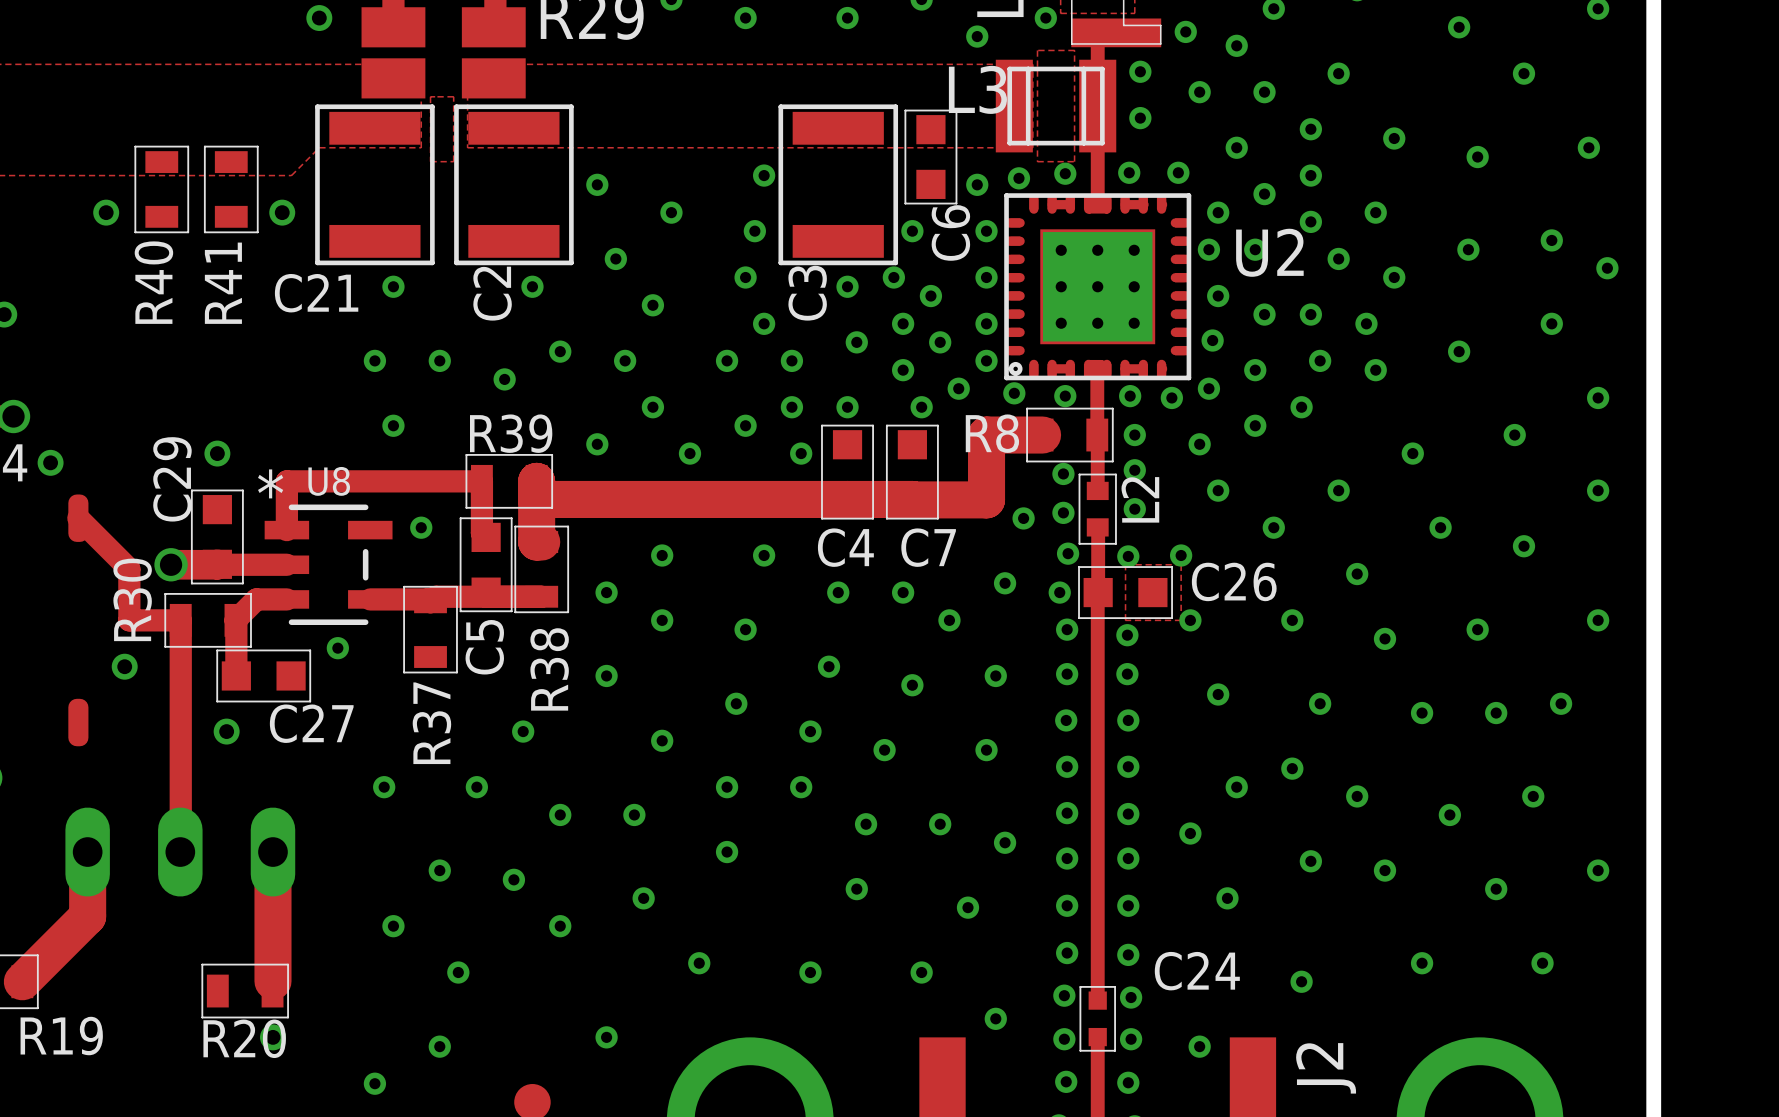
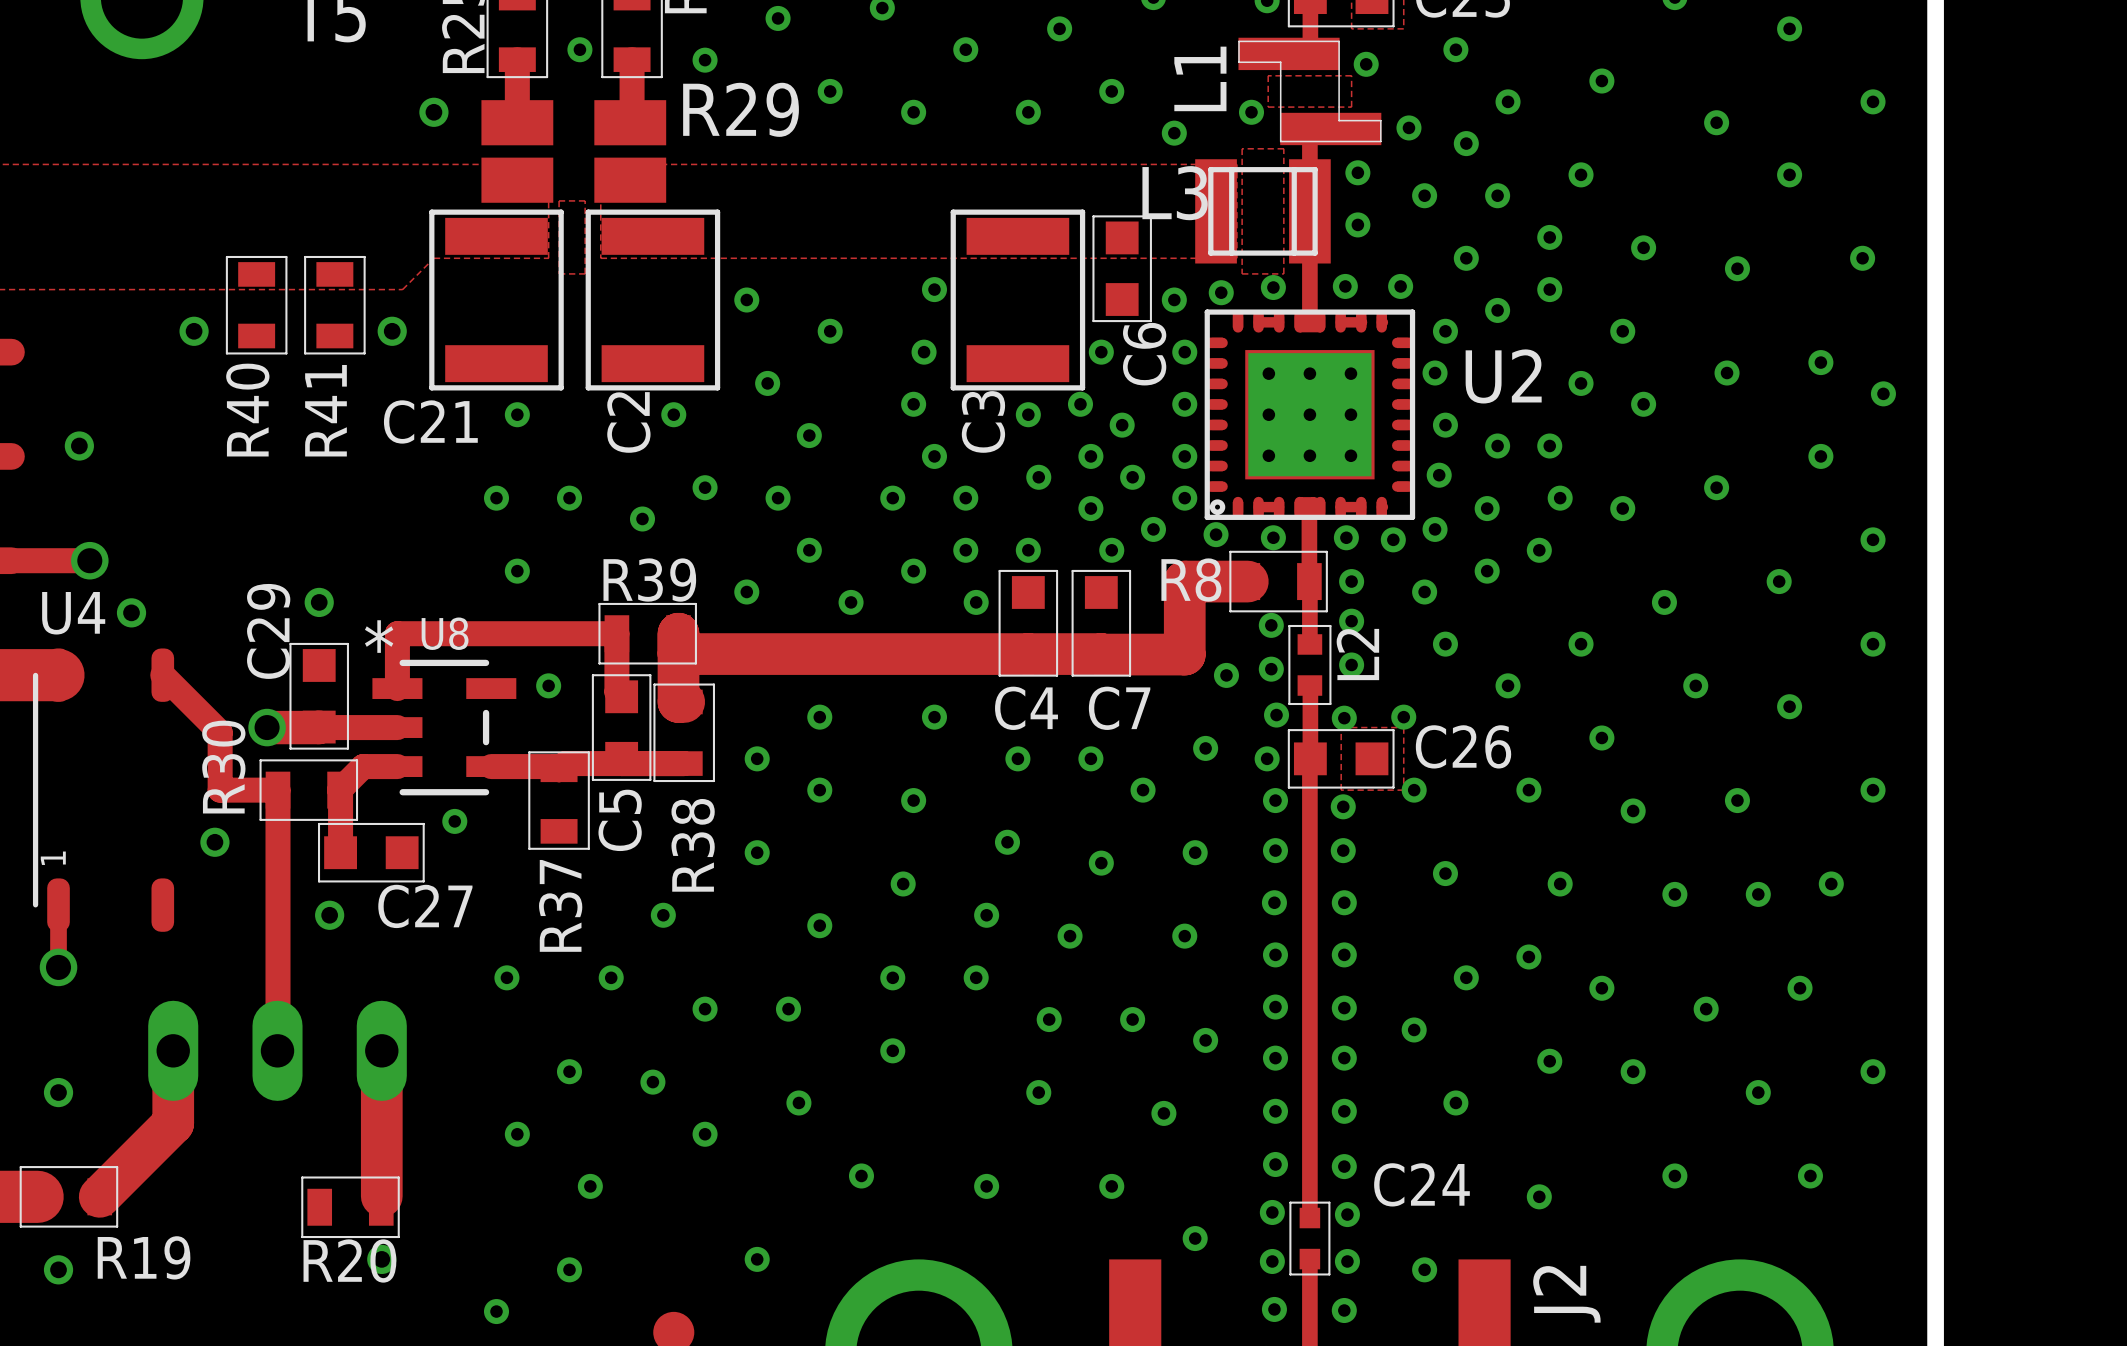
via: (1310, 221) -> none
via: (1255, 249) -> none
via: (1366, 323) -> none

